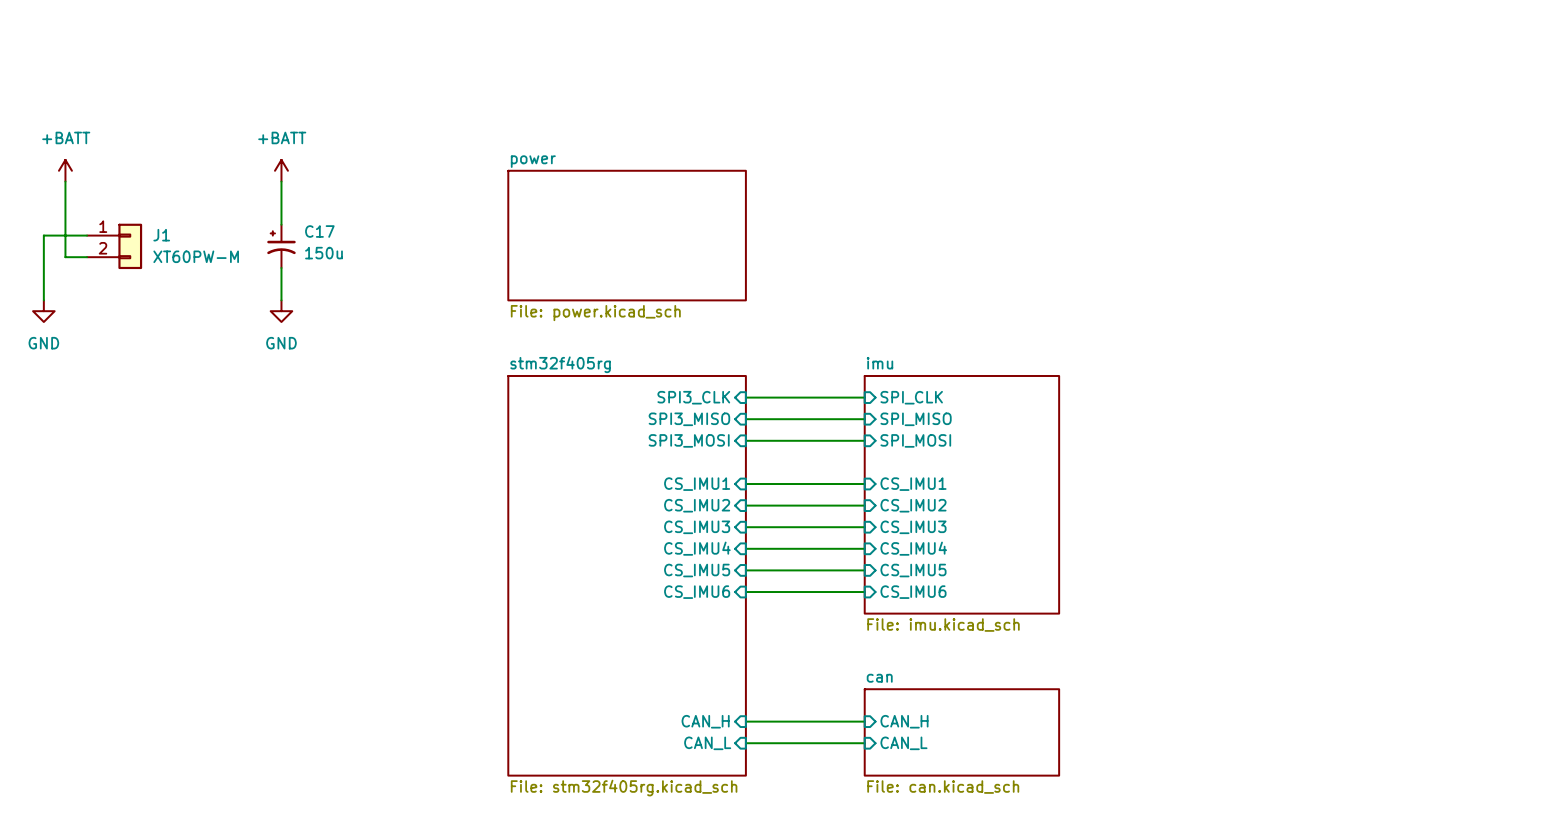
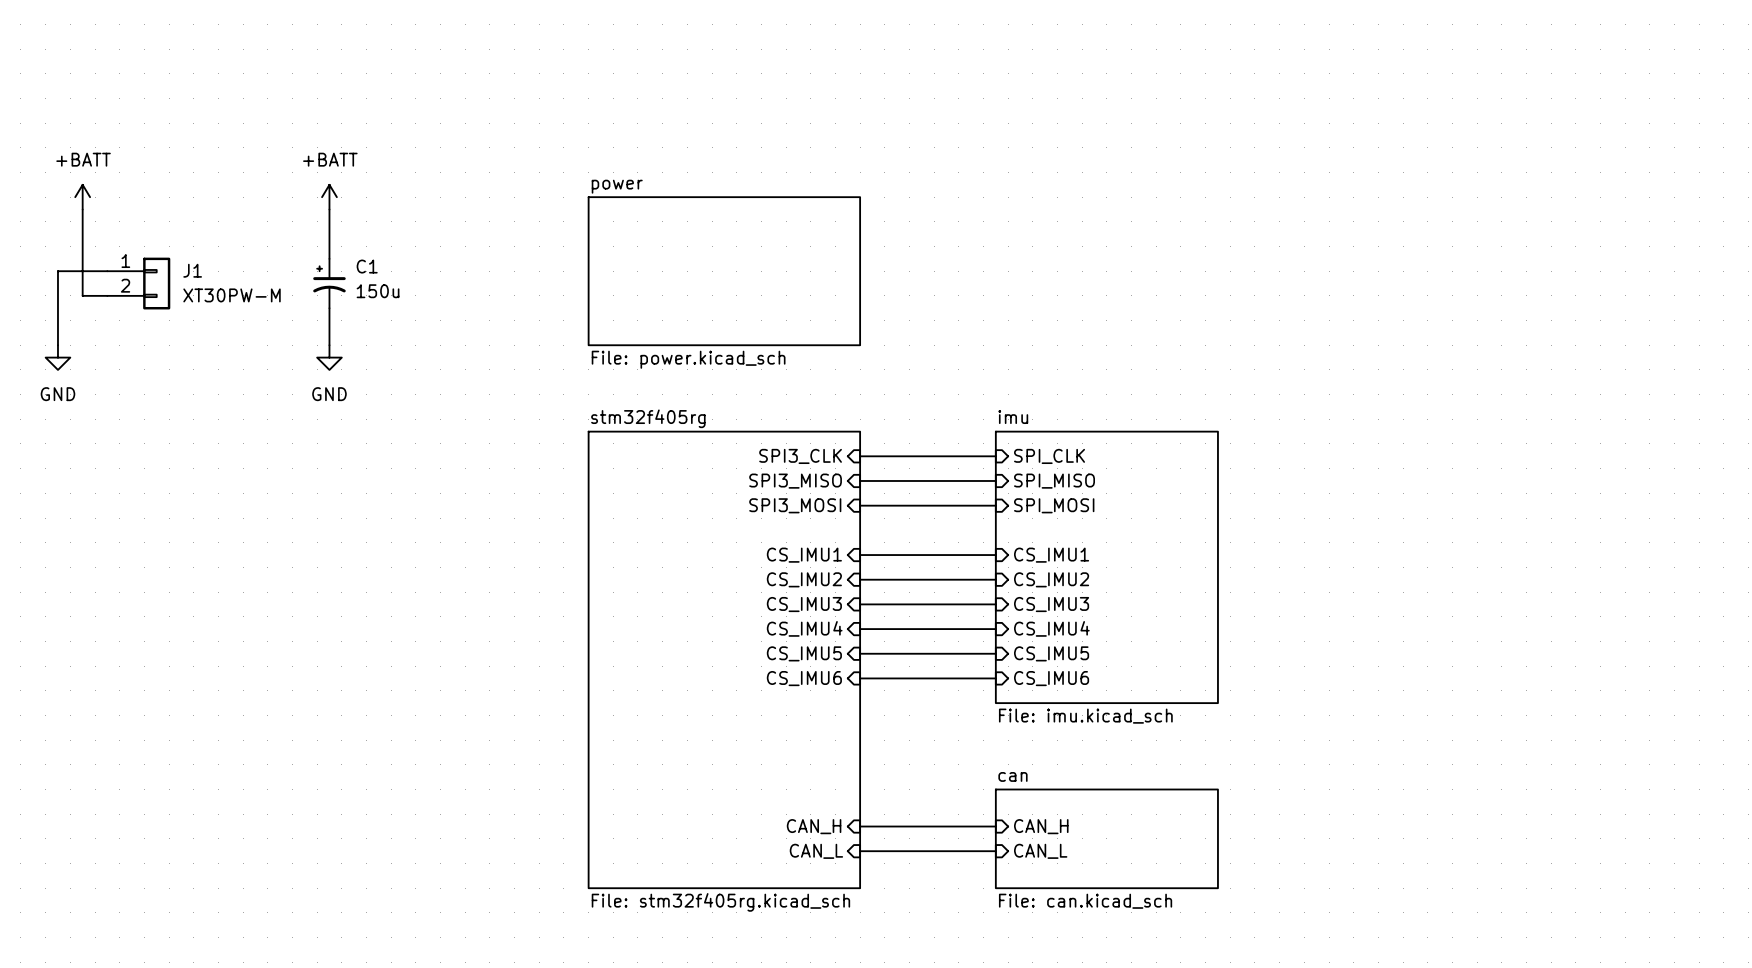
C17 name: C17 (319, 231) -> C1 (367, 266)
J1 value: XT60PW-M (196, 256) -> XT30PW-M (232, 295)

